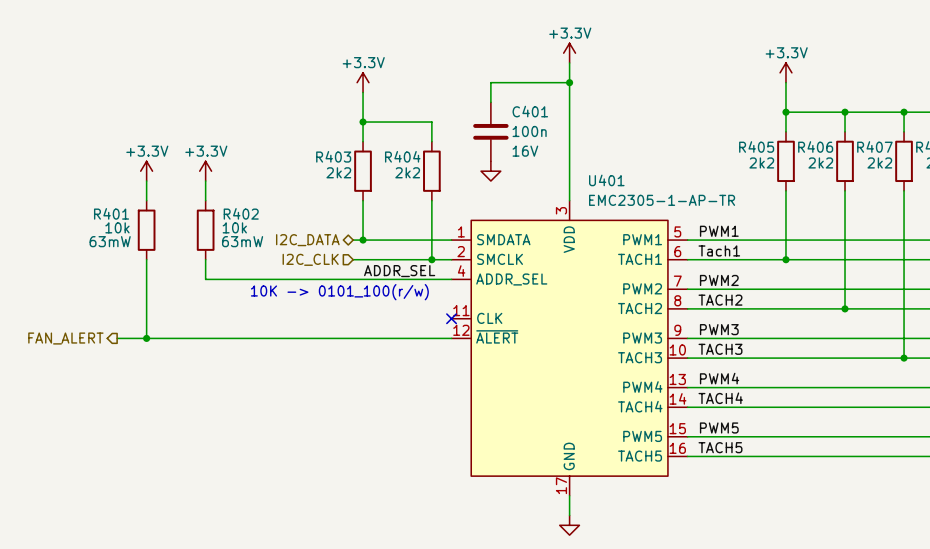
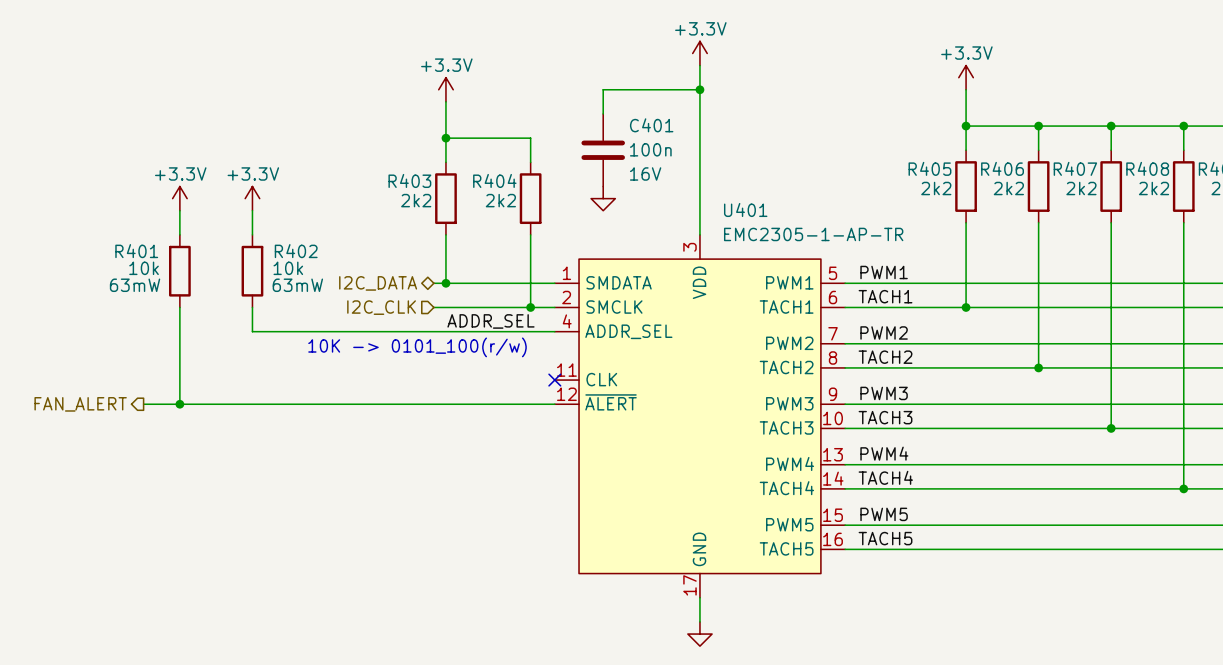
label: Tach1 (719, 250) -> TACH1 (885, 296)

